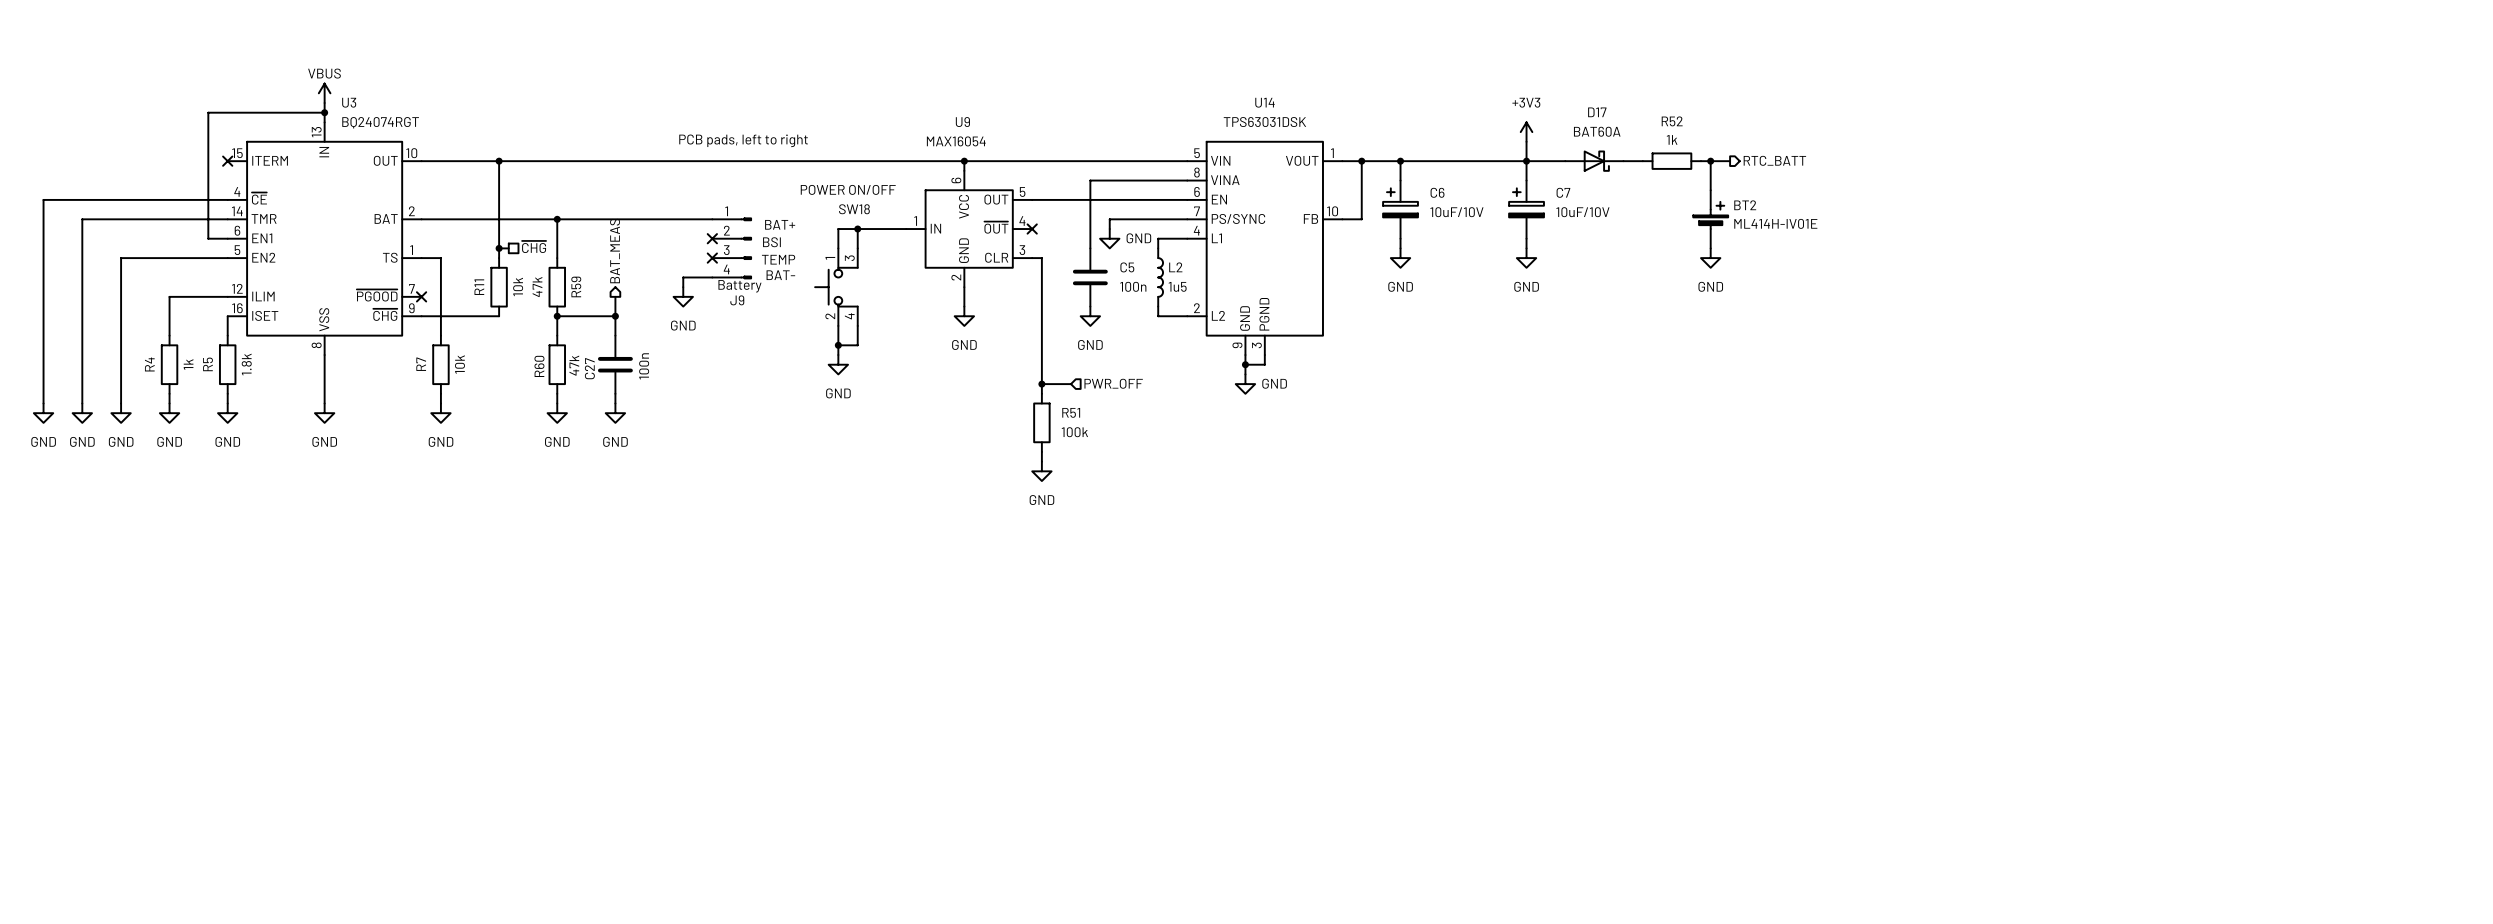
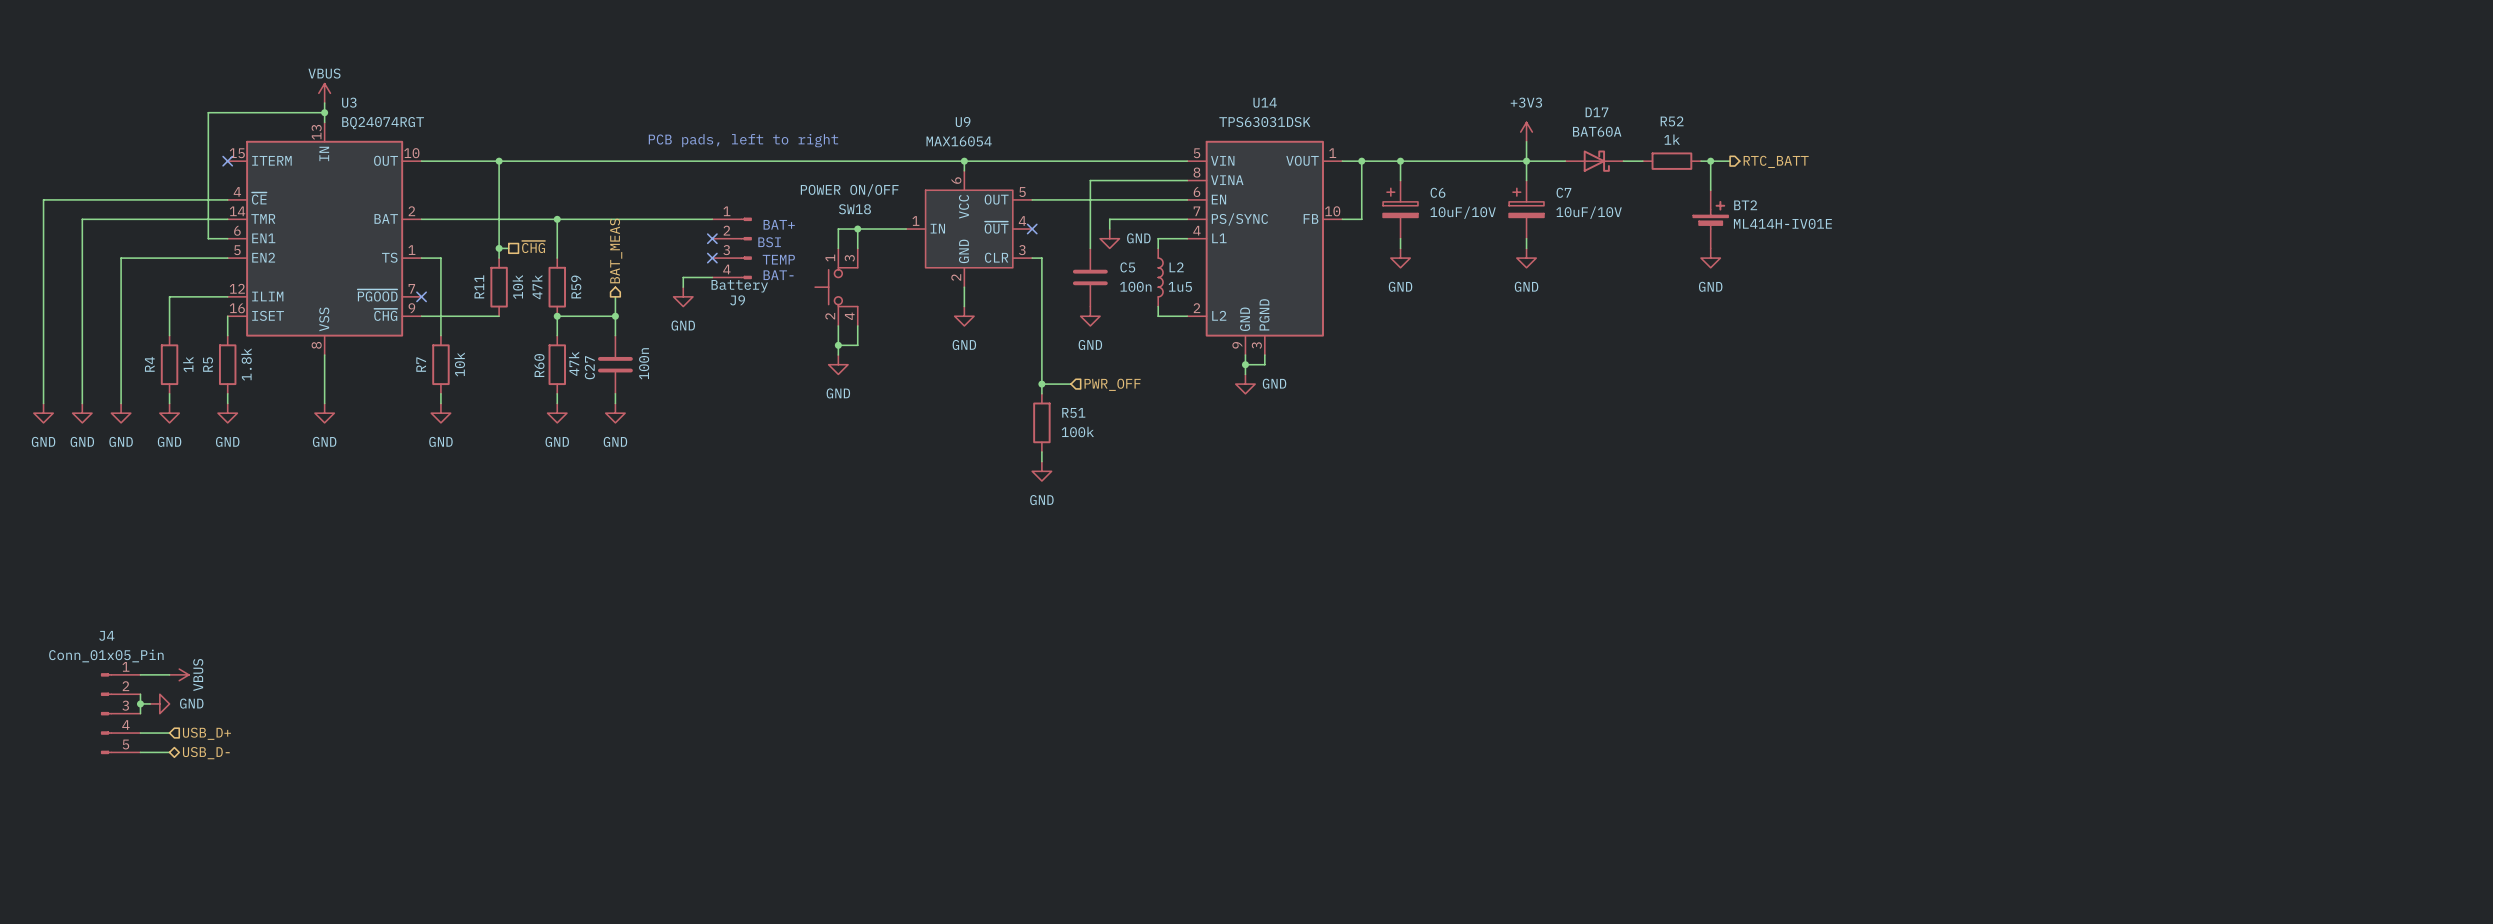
wire: none -> (140, 674) (169, 674)
power symbol: none -> VBUS (179, 674)
wire: none -> (140, 694) (140, 713)
wire: none -> (140, 703) (150, 703)
junction: none -> (140, 703)
power symbol: none -> GND (159, 703)
J4: none -> Conn_01x05_Pin (120, 713)
hierarchical label: none -> USB_D+ (206, 733)
wire: none -> (140, 733) (169, 733)
wire: none -> (140, 752) (169, 752)
hierarchical label: none -> USB_D- (206, 753)

